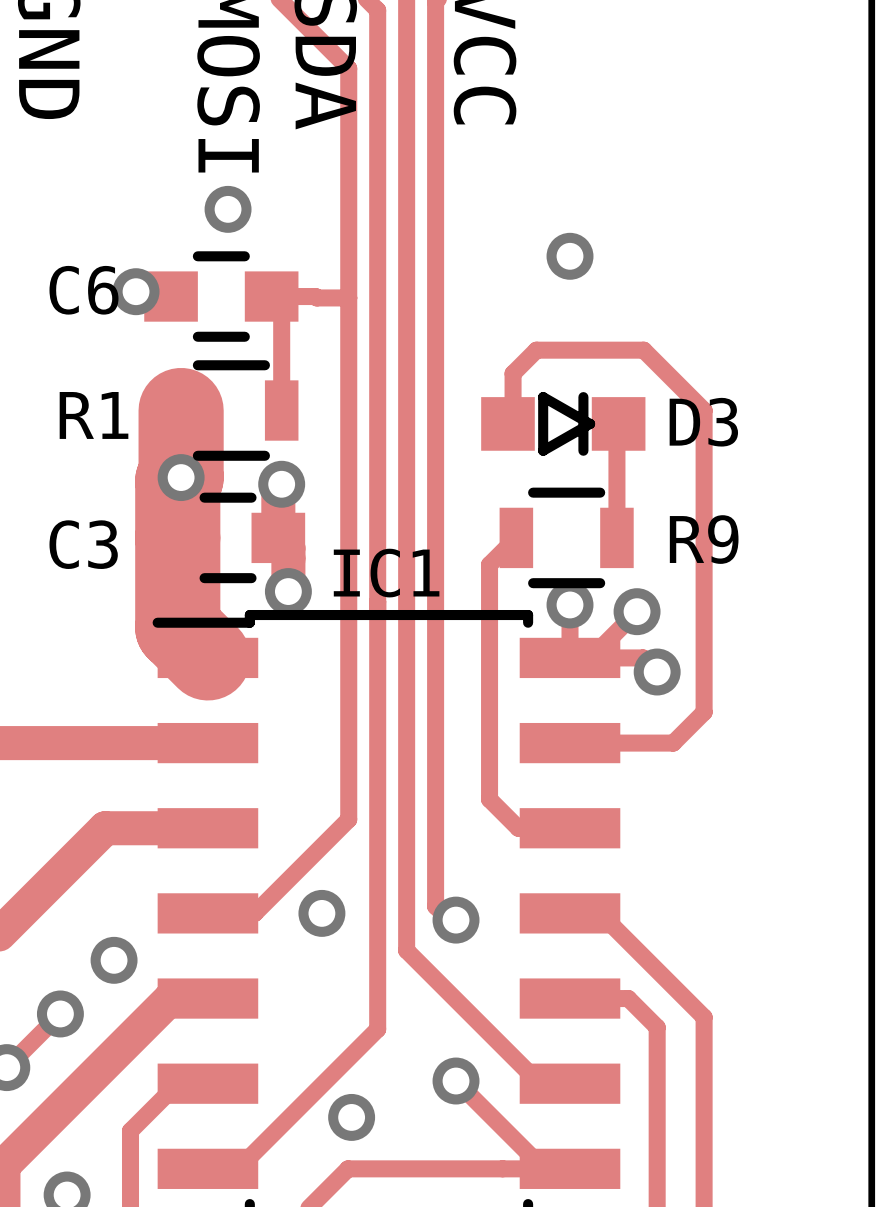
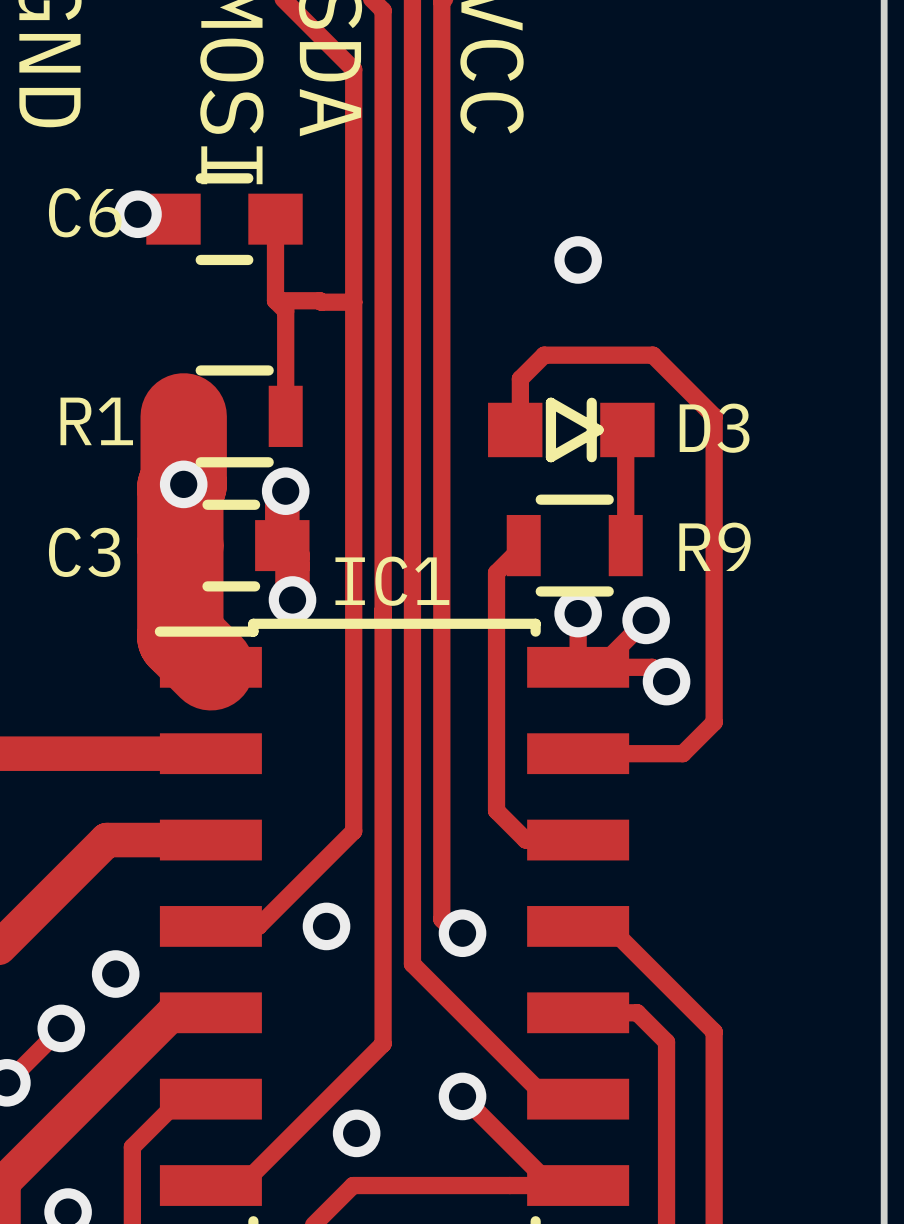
via: (228, 209) -> none
via: none -> (137, 214)
top track: none -> (275, 219) (275, 300)
via: (136, 291) -> none
C6 position: (221, 296) -> (224, 219)

